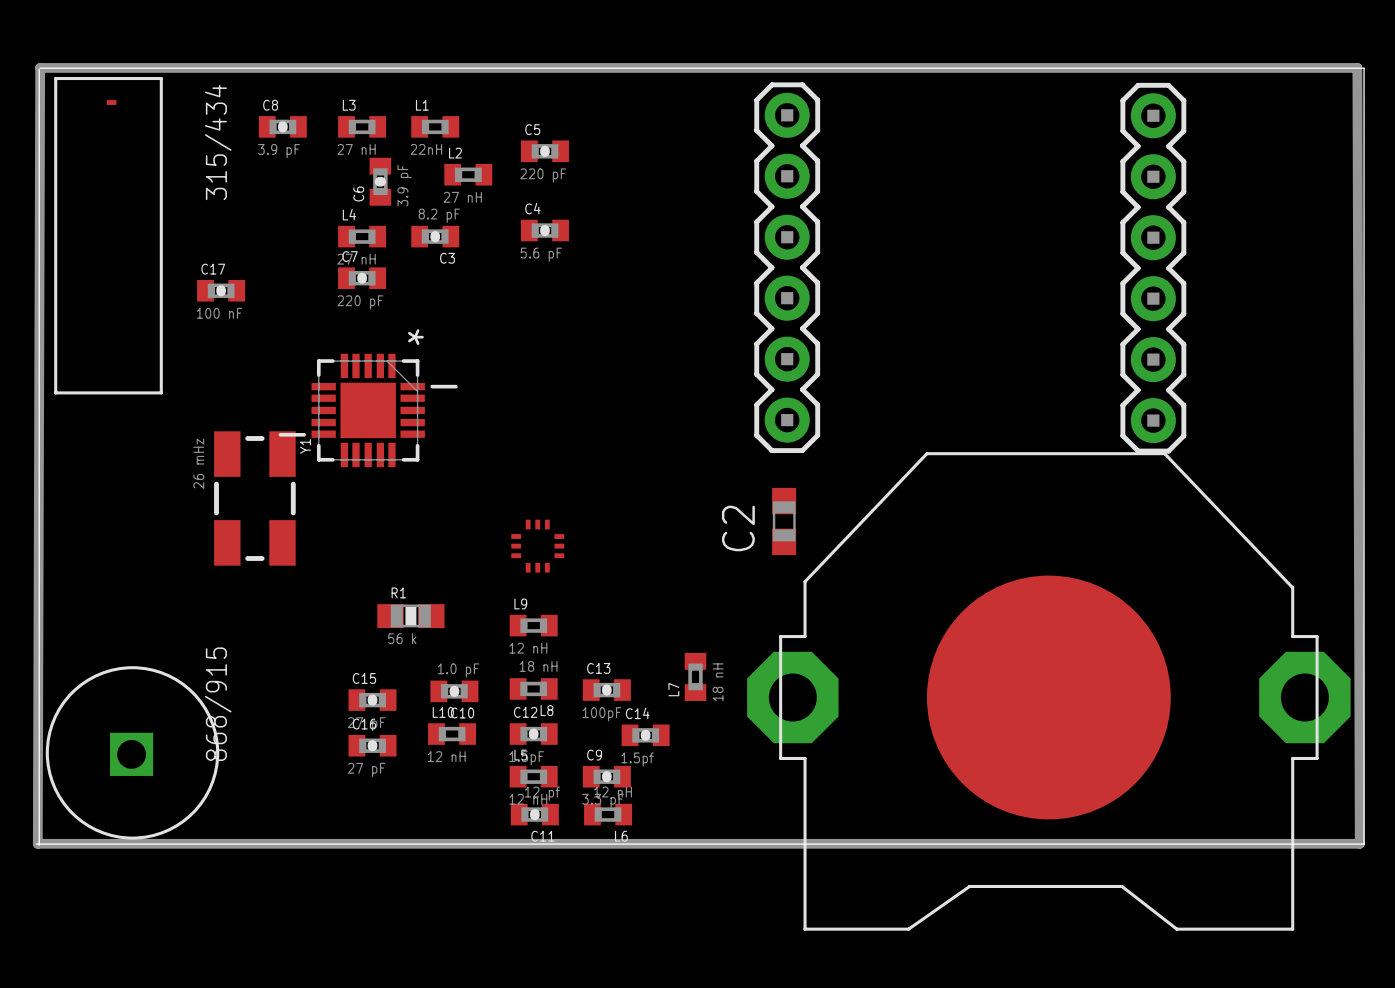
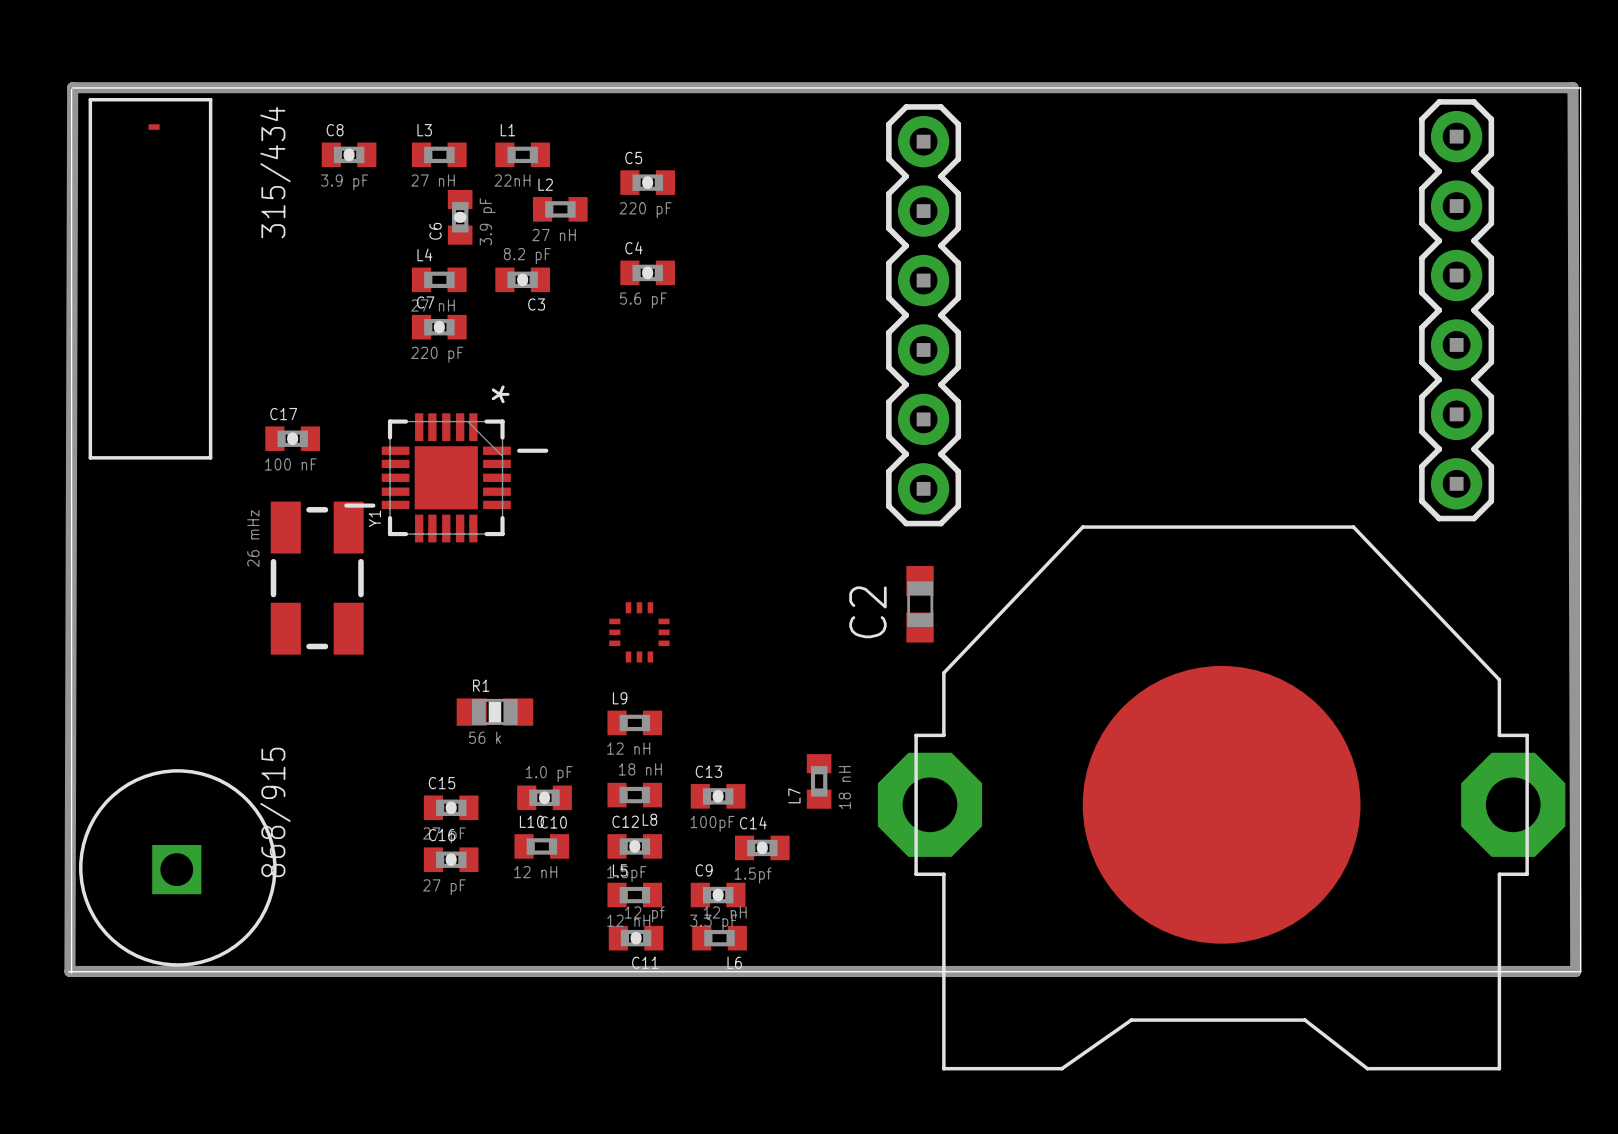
part position: (1153, 268) -> (1456, 310)
C17 position: (221, 290) -> (292, 438)

